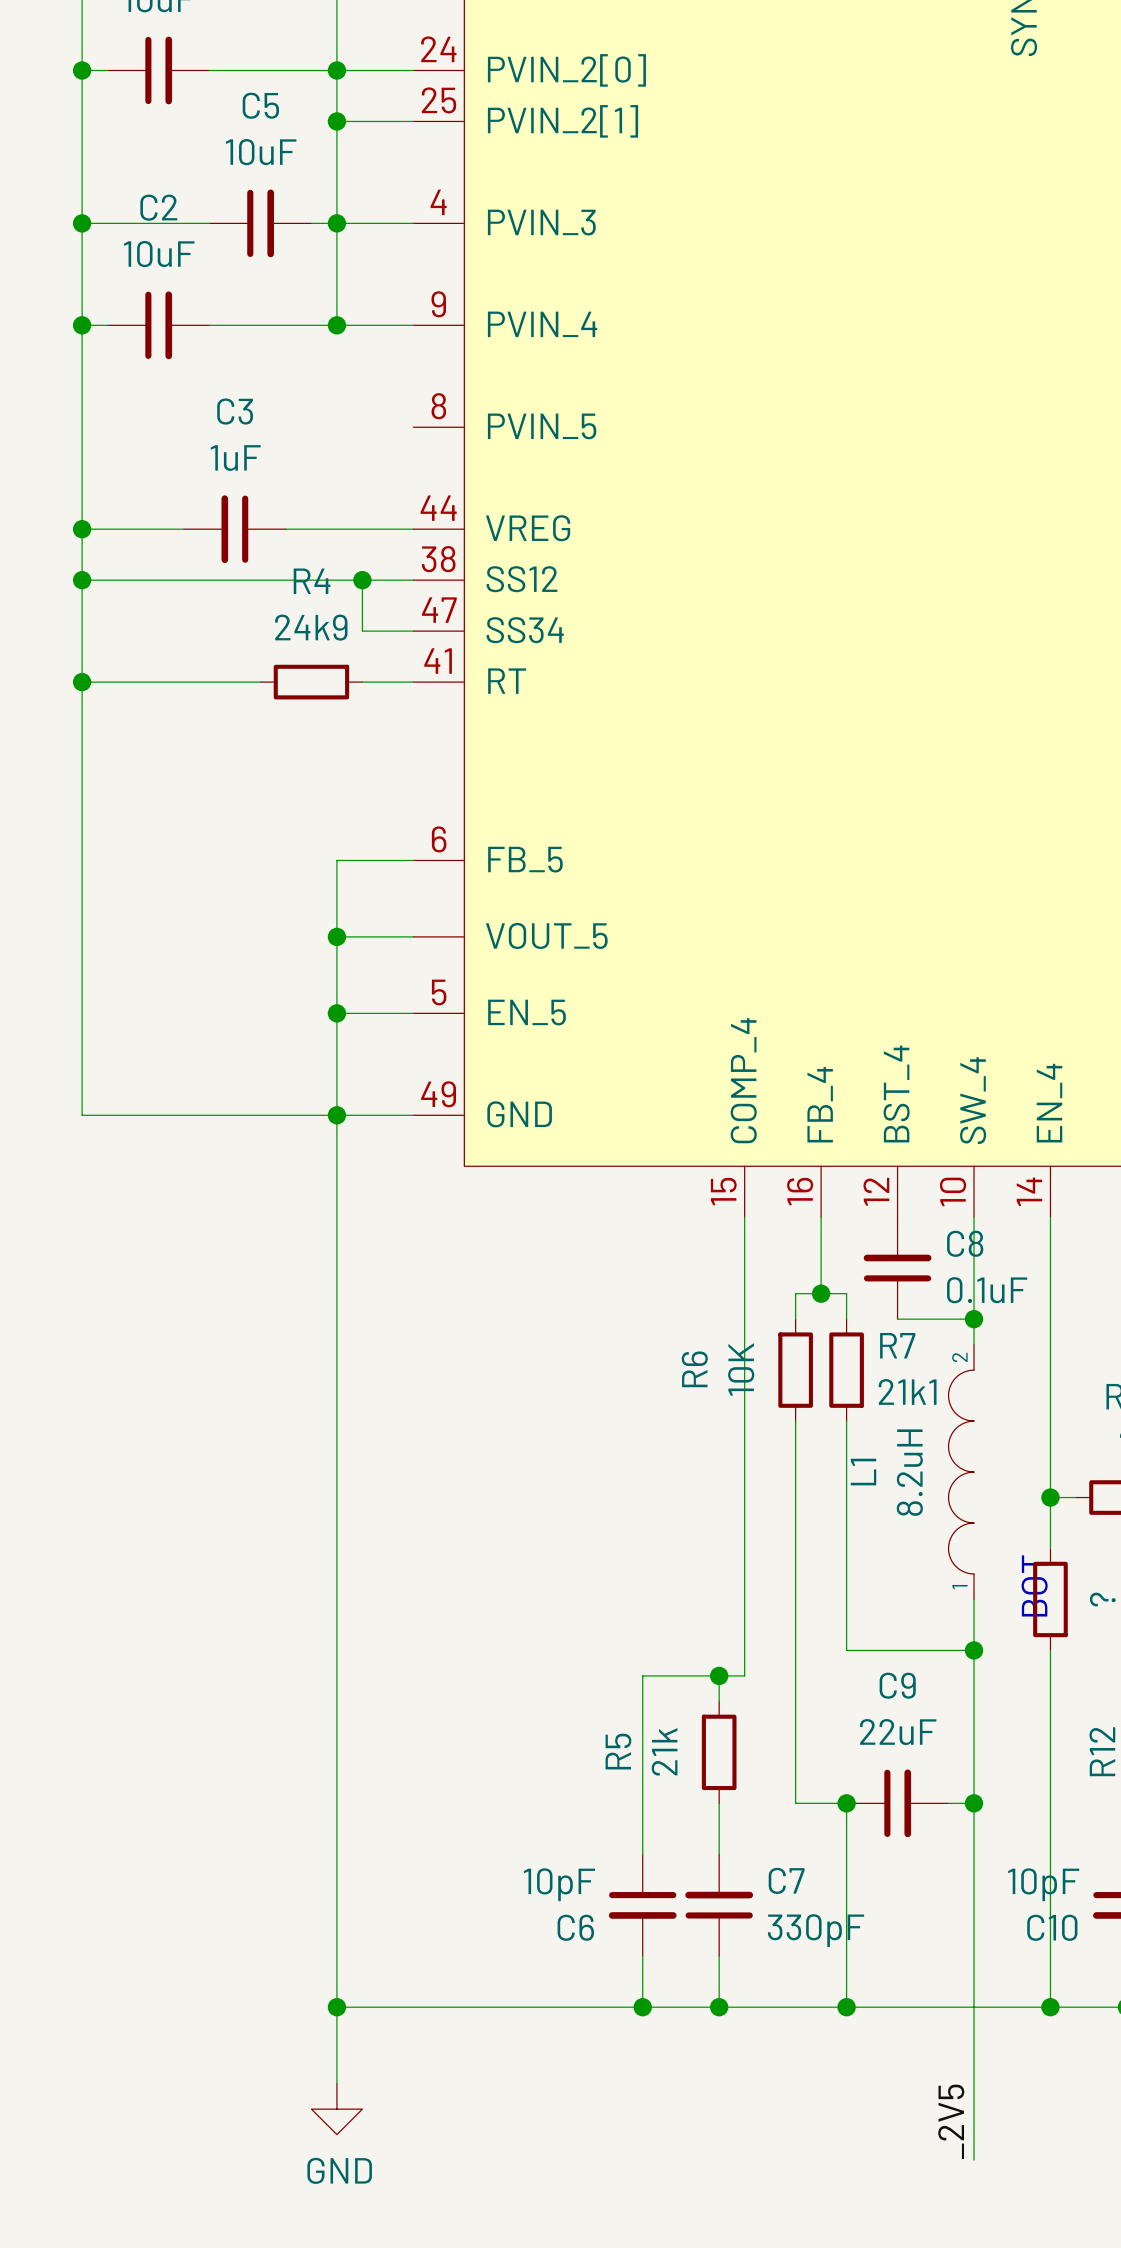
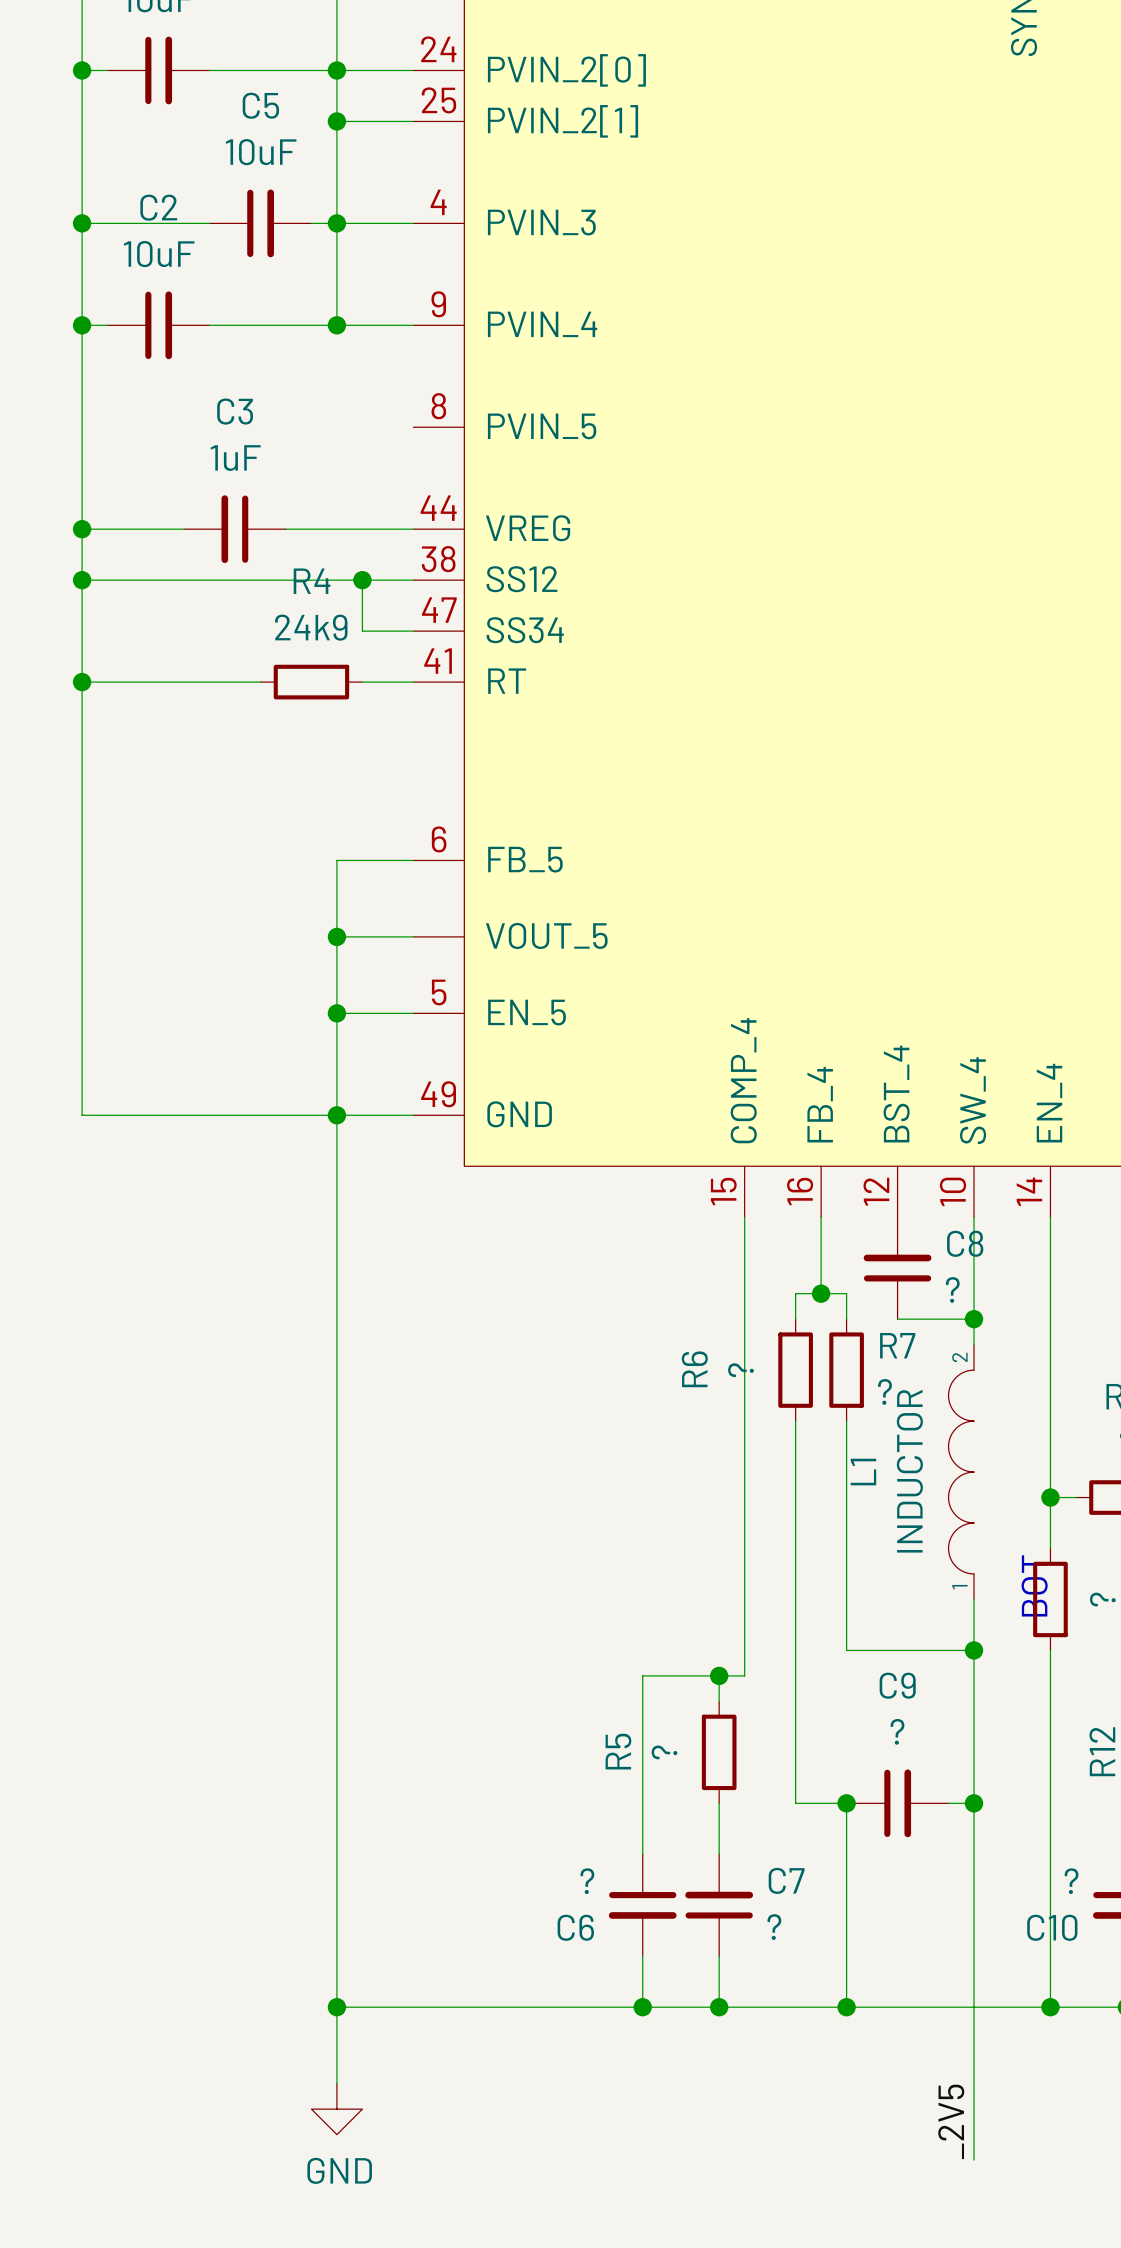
C8 value: 0.1uF (987, 1290) -> ? (952, 1289)
R6 value: 10K (741, 1369) -> ? (740, 1370)
R7 value: 21k1 (907, 1391) -> ? (885, 1391)
L1 value: 8.2uH (909, 1472) -> INDUCTOR (909, 1471)
C9 value: 22uF (898, 1732) -> ? (897, 1731)
R5 value: 21k (664, 1751) -> ? (664, 1752)
C6 value: 10pF (559, 1884) -> ? (587, 1881)
C10 value: 10pF (1043, 1884) -> ? (1071, 1881)
C7 value: 330pF (815, 1930) -> ? (774, 1927)

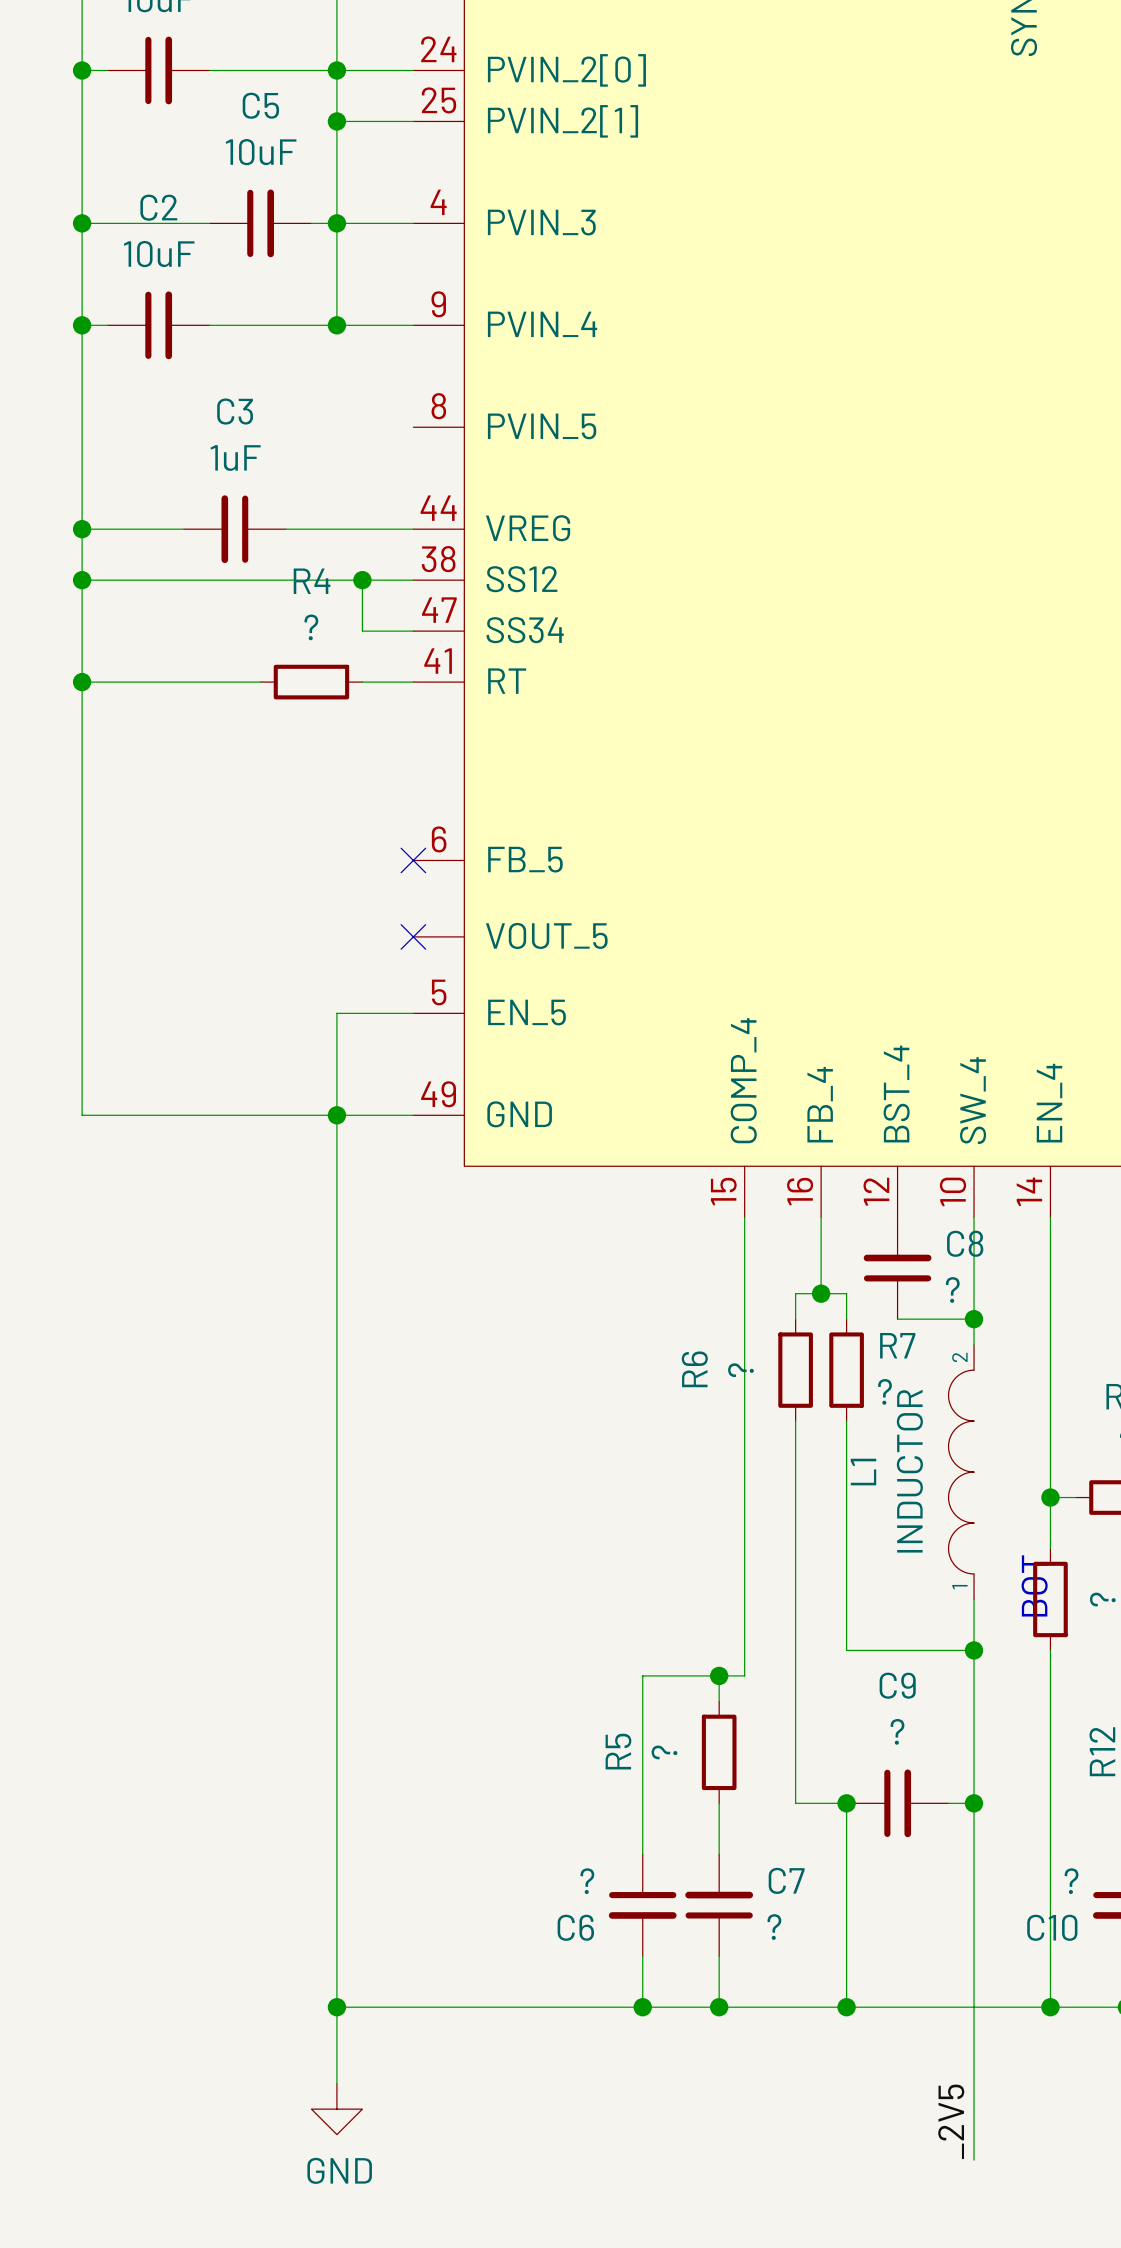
R4 value: 24k9 (311, 627) -> ? (311, 627)
wire: (413, 860) (336, 860) (336, 1013) -> none
no-connect mark: none -> (413, 860)
wire: (336, 936) (413, 936) -> none
junction: (336, 936) -> none
no-connect mark: none -> (413, 936)
junction: (336, 1013) -> none

